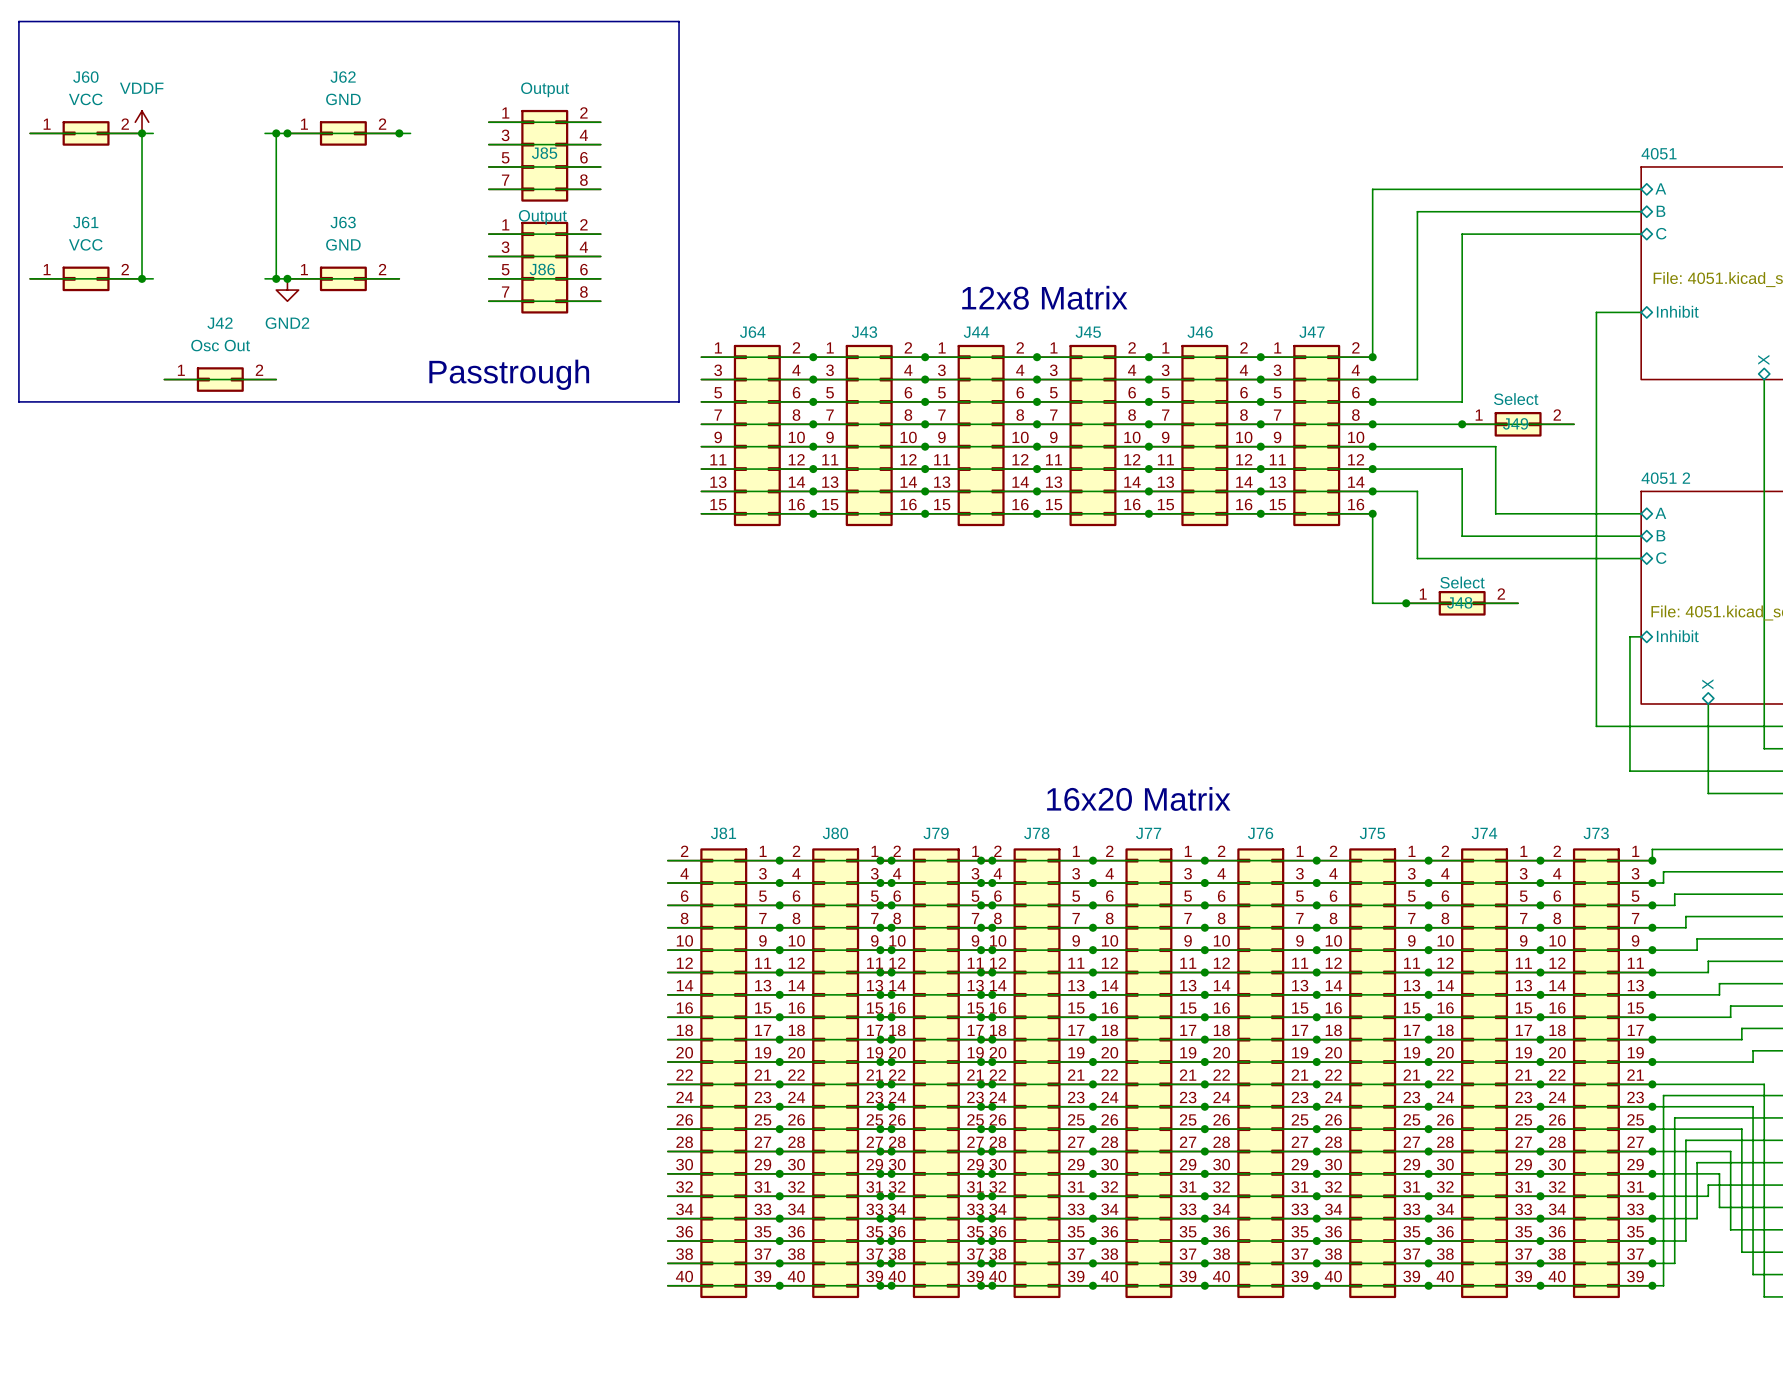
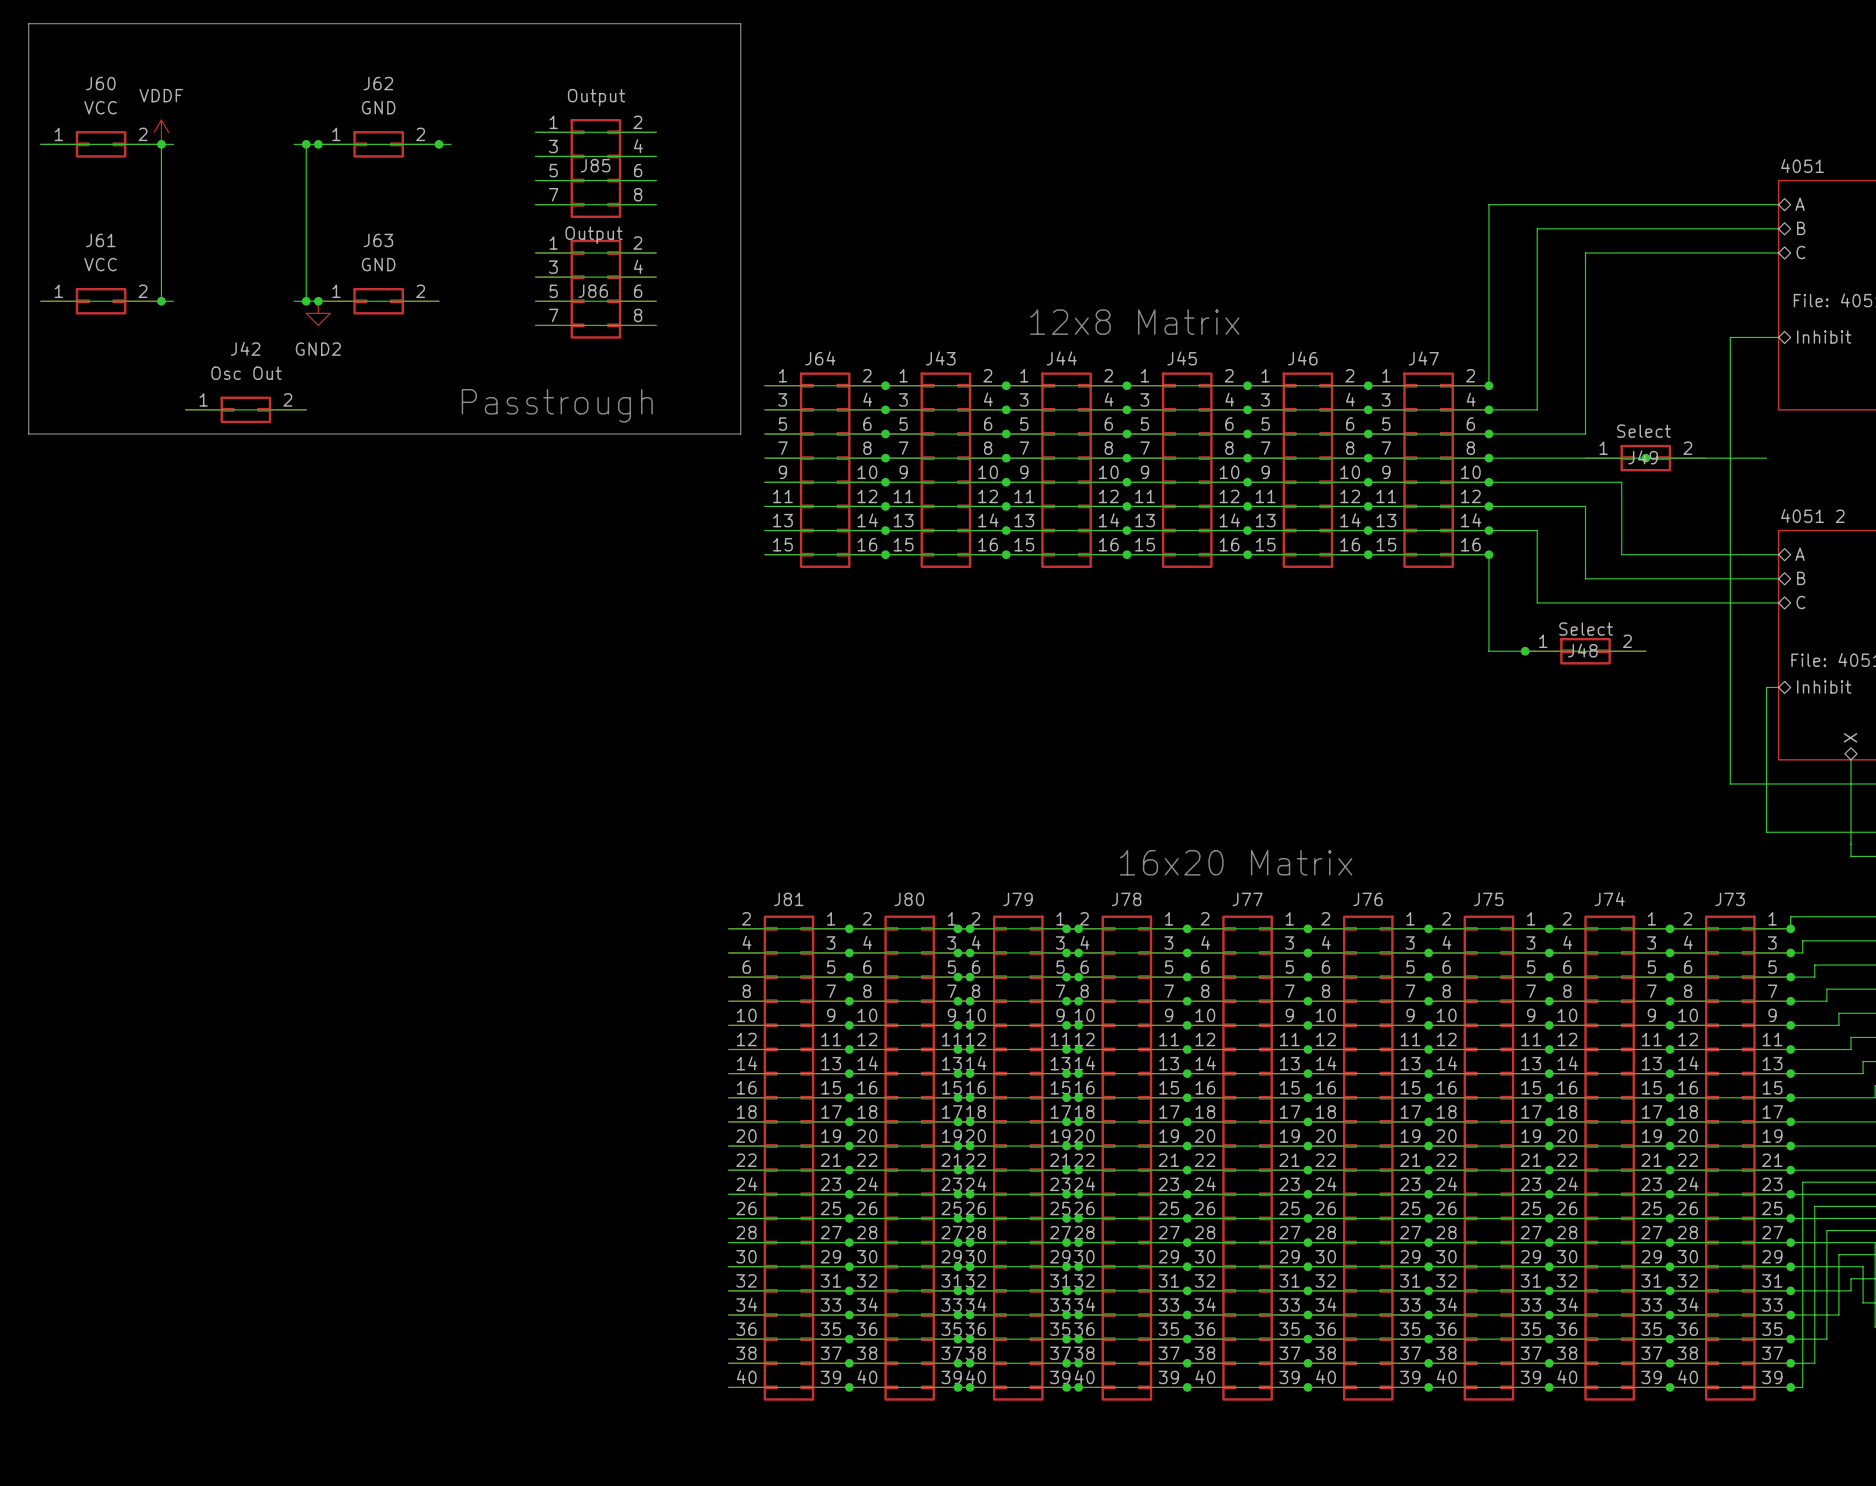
junction: (1462, 424) -> none
junction: none -> (1645, 458)
wire: none -> (1706, 458) (1766, 458)

